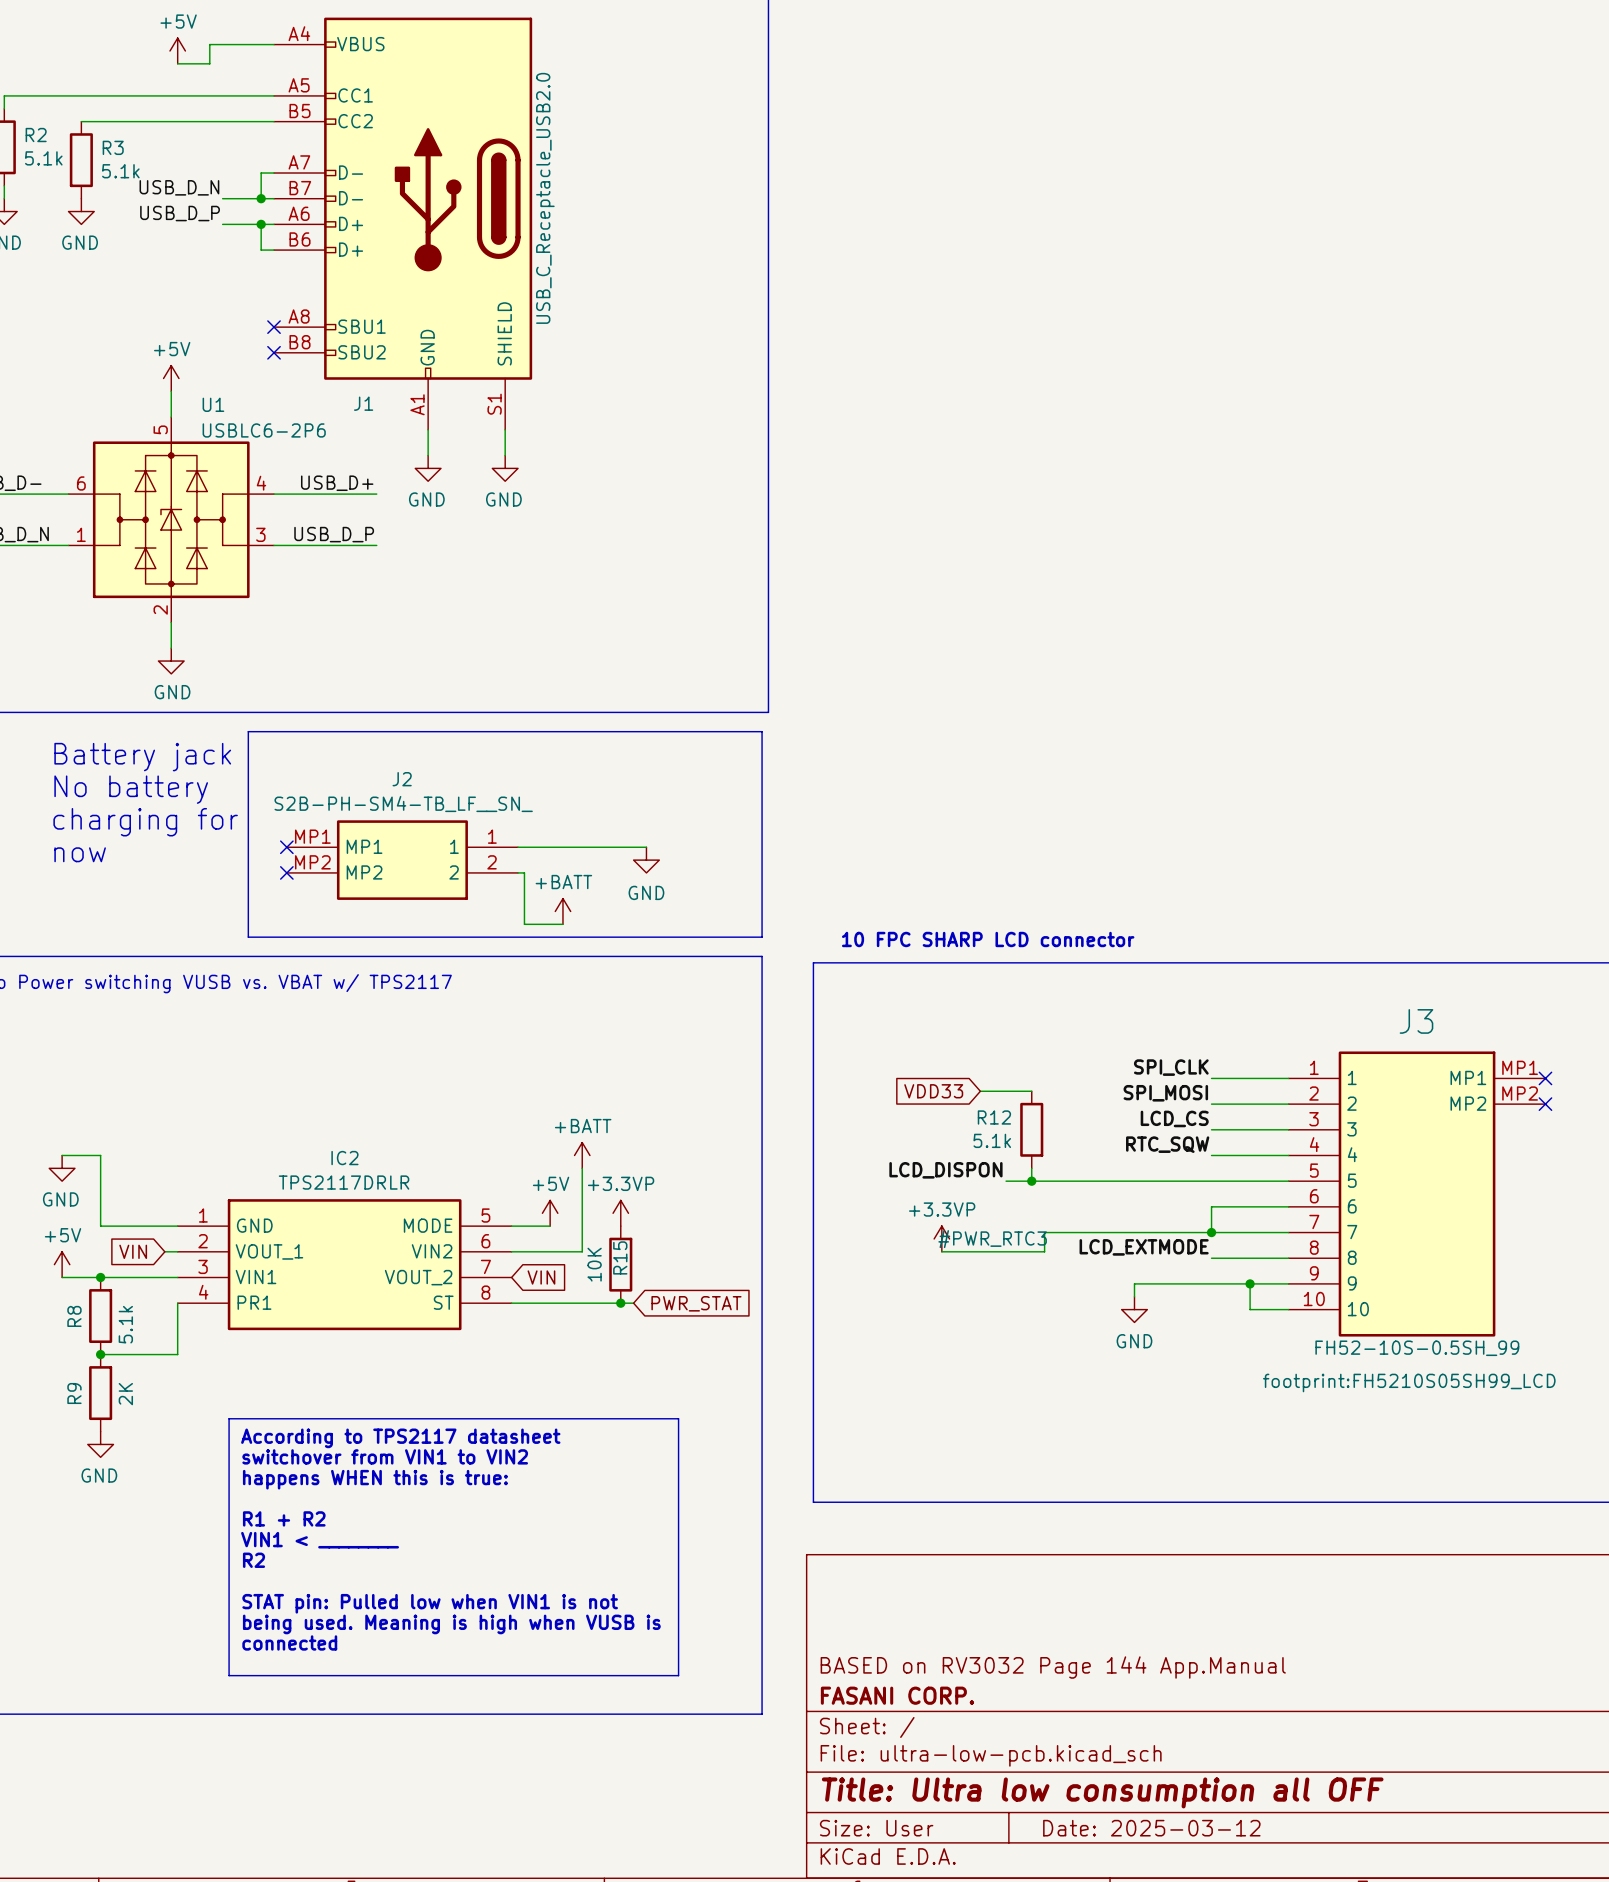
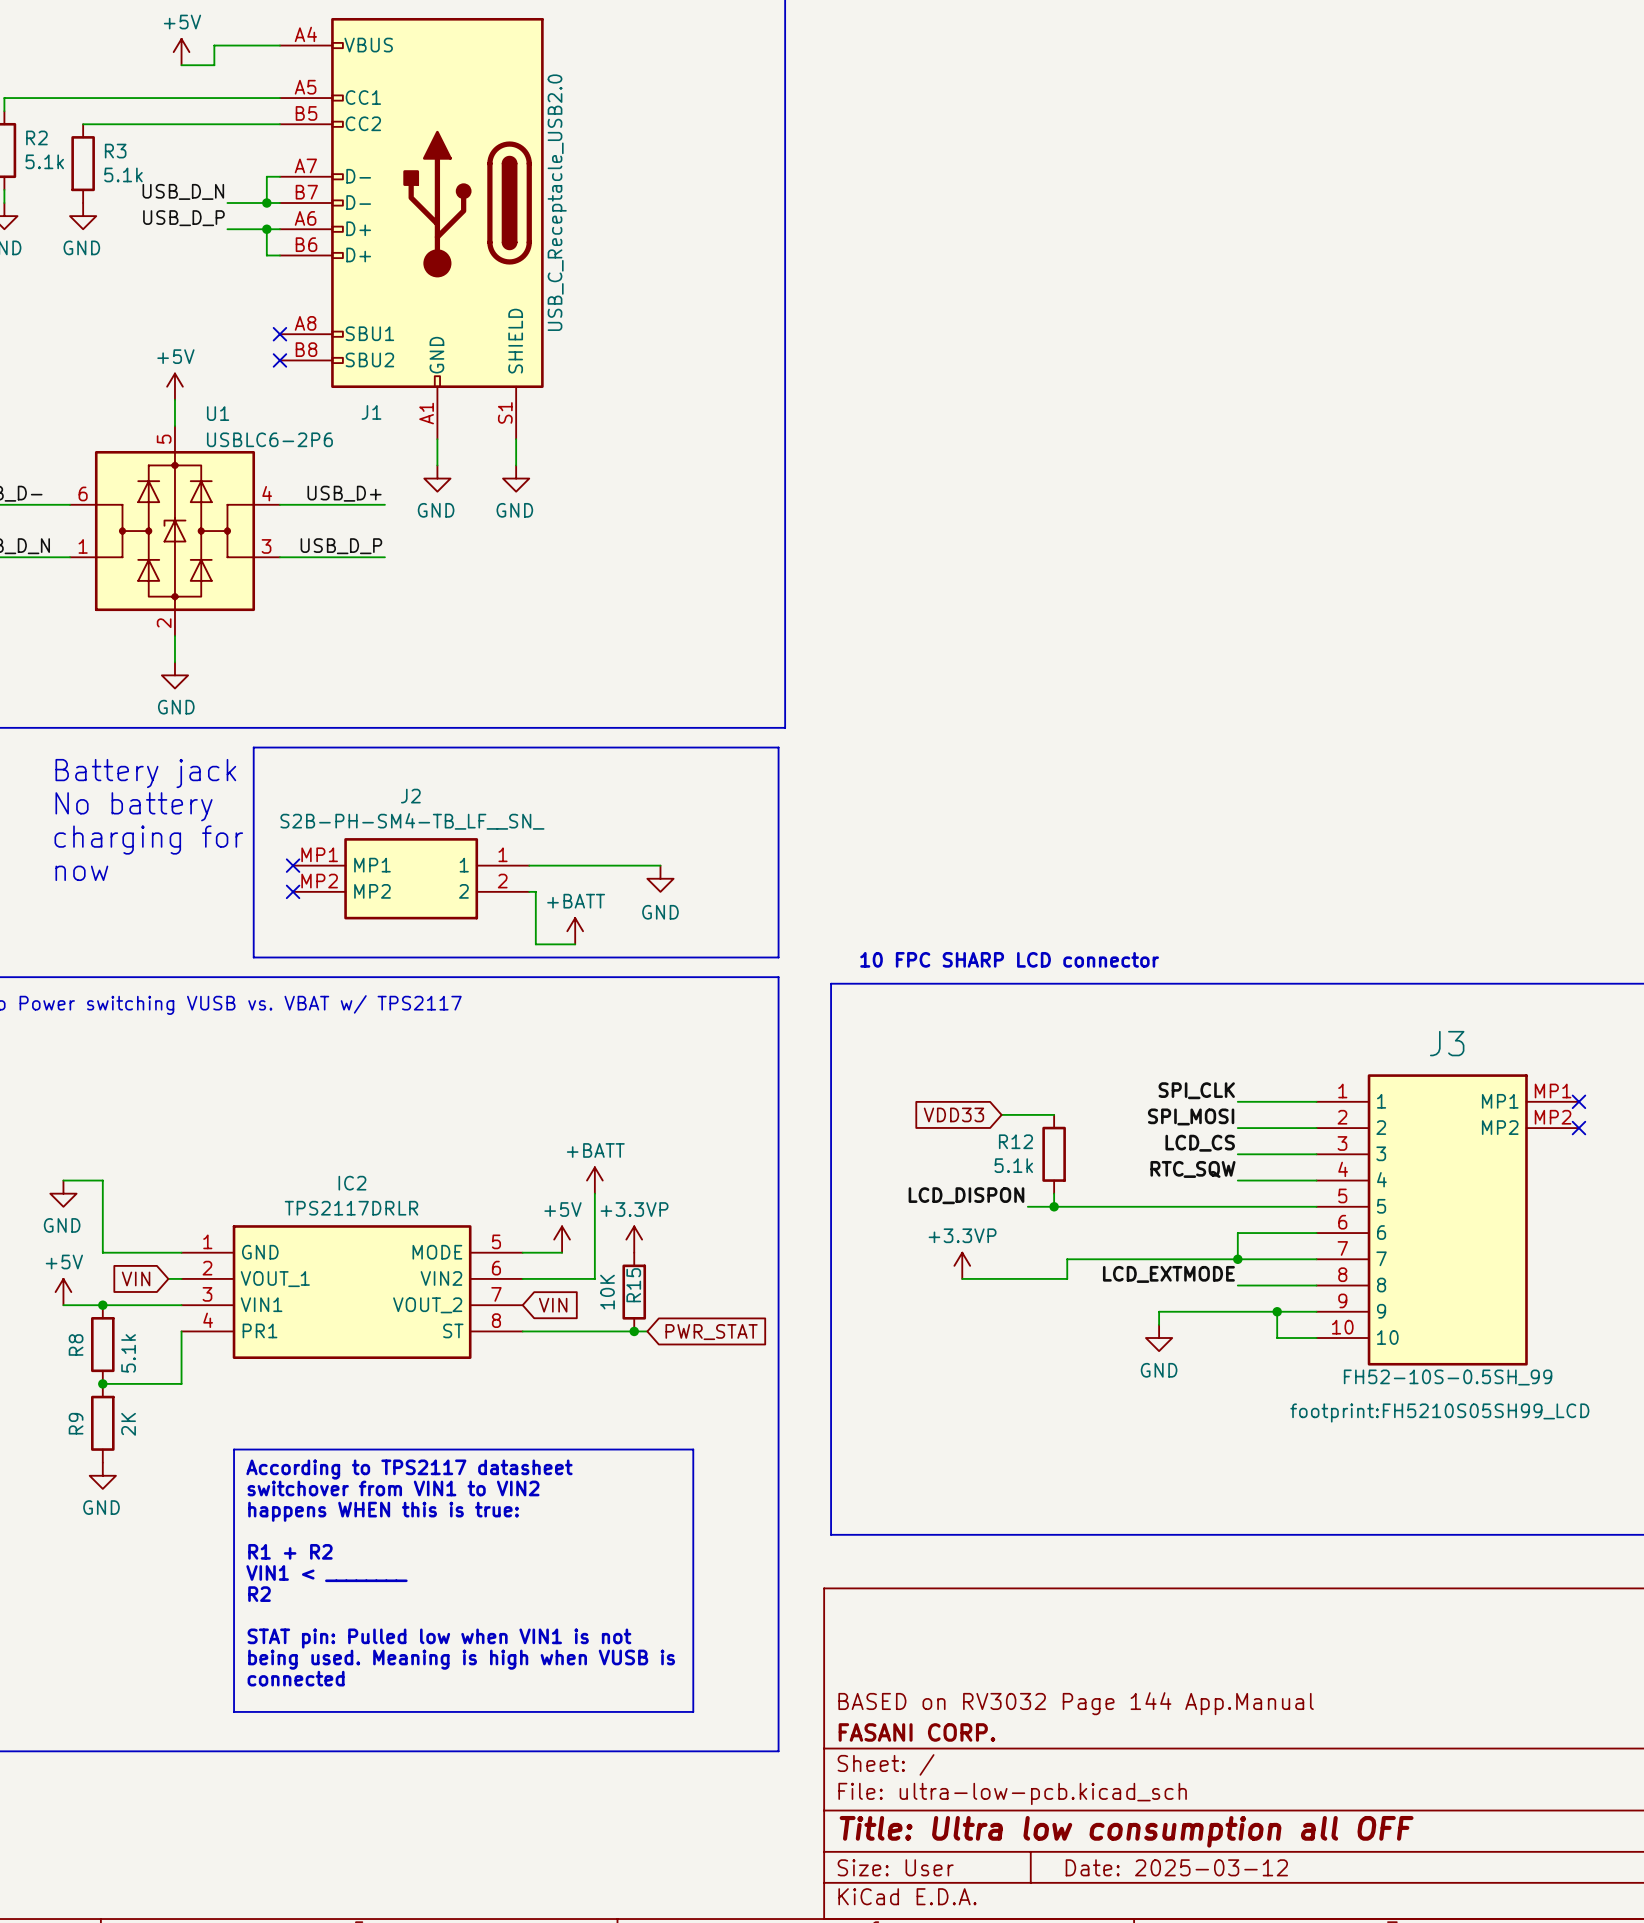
#PWR_RTC3 name: #PWR_RTC3 (992, 1239) -> none

